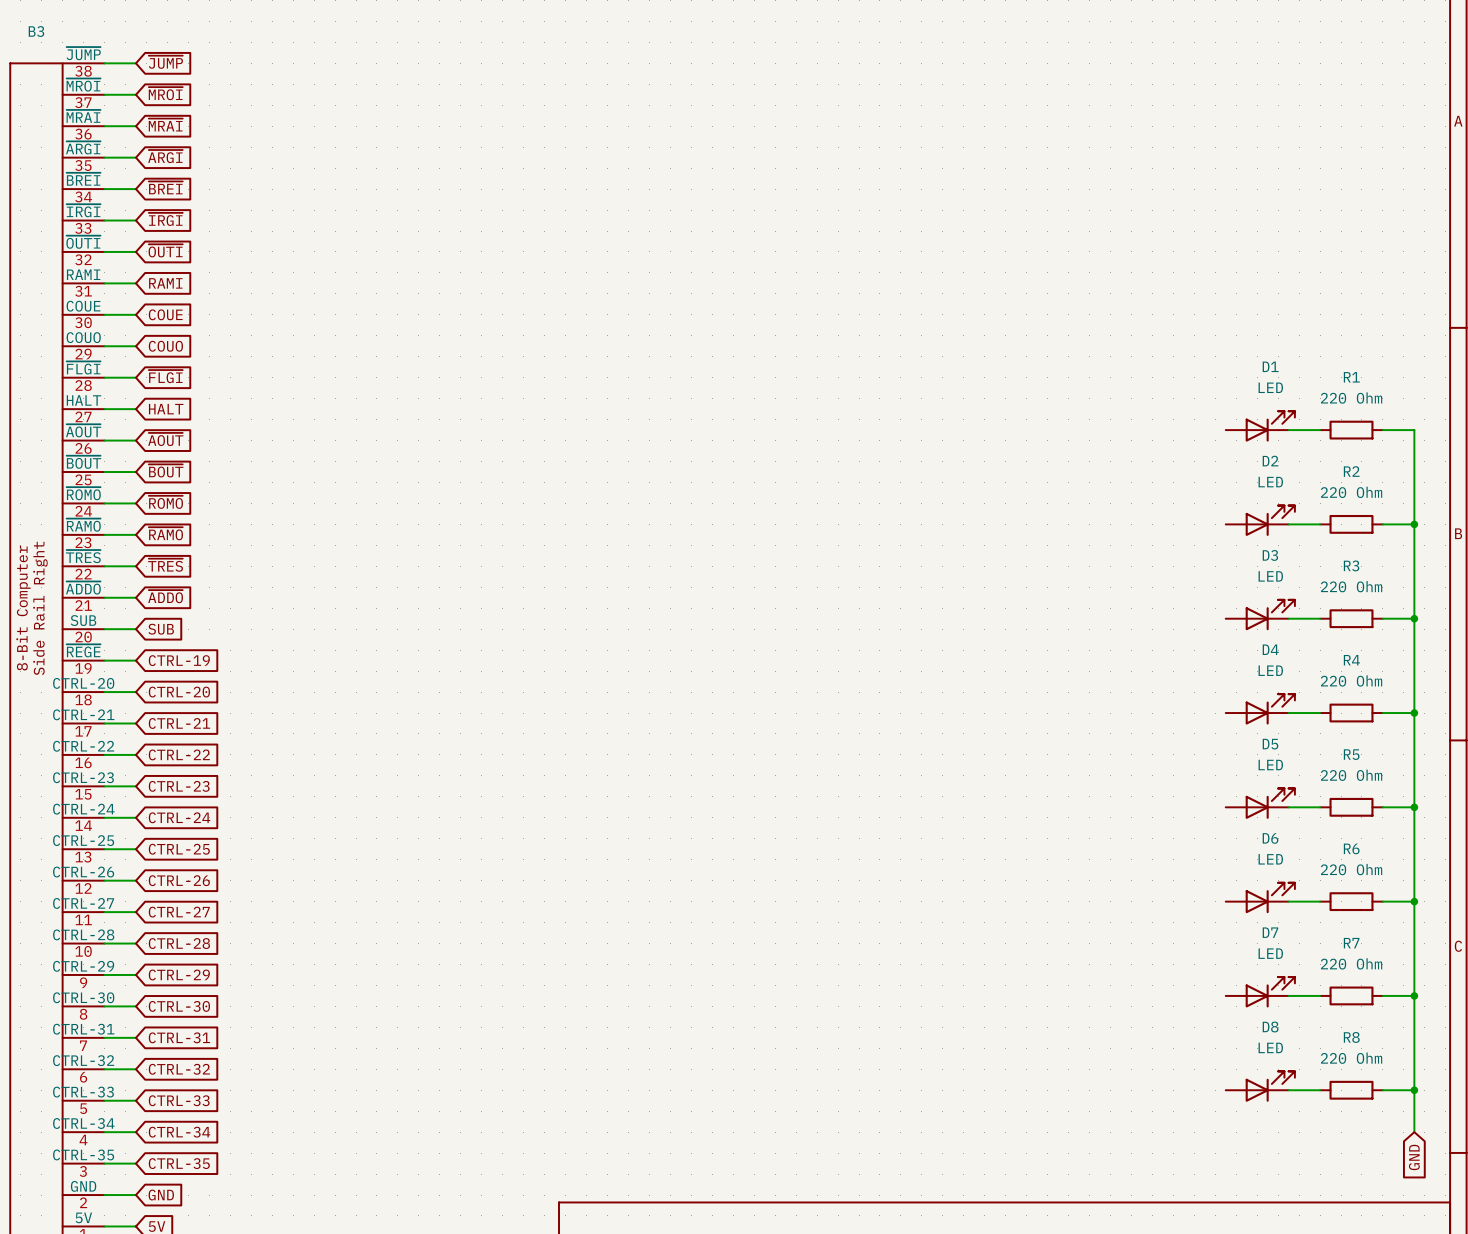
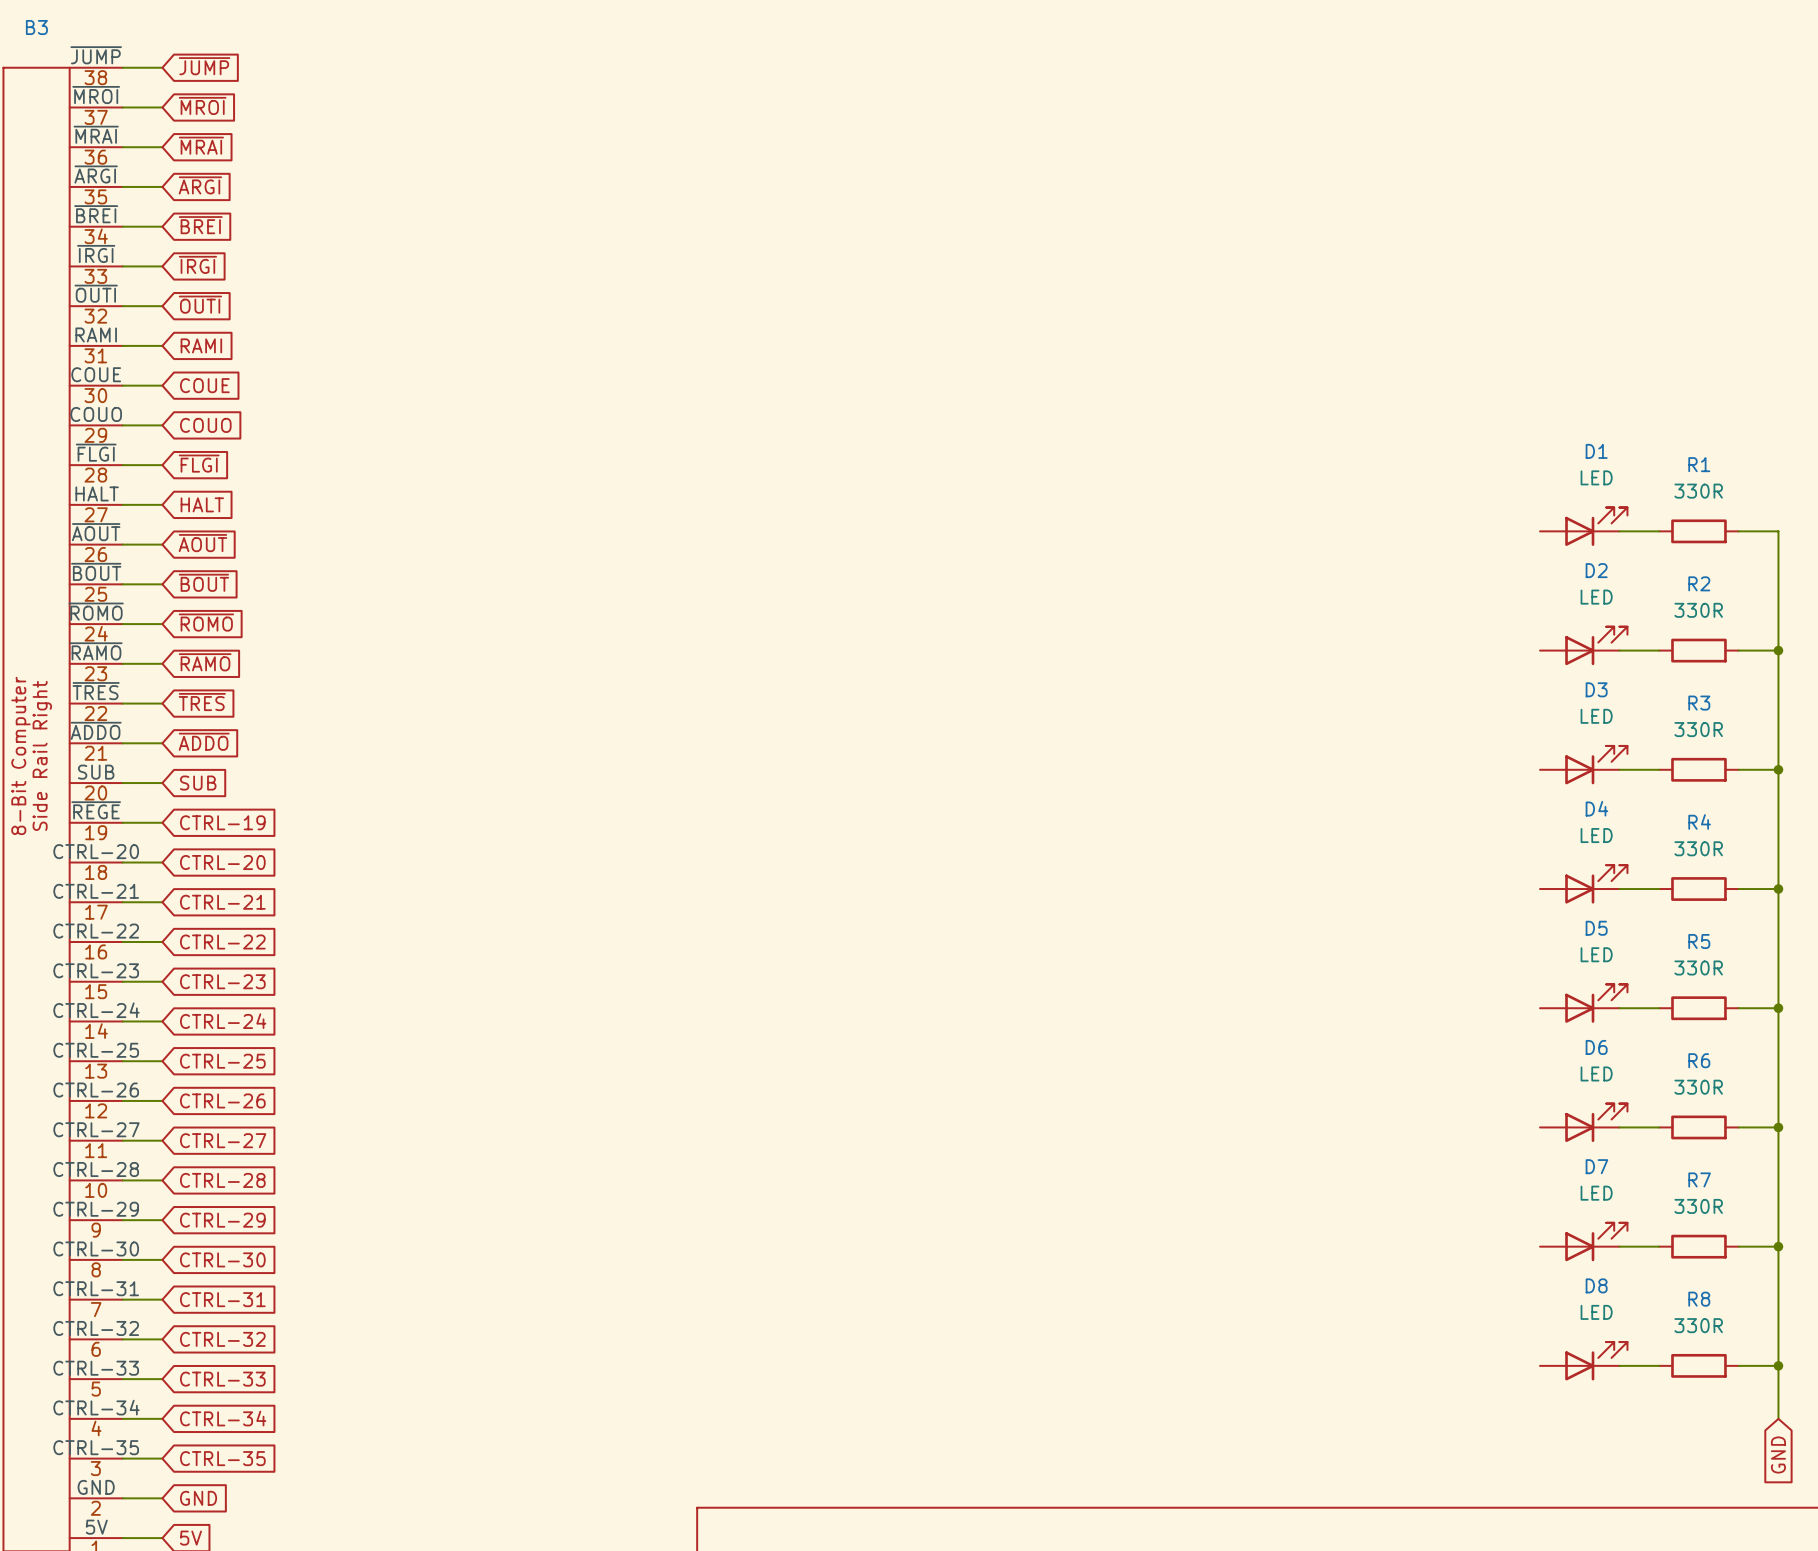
R1 value: 220 Ohm (1351, 398) -> 330R (1698, 491)
R2 value: 220 Ohm (1351, 492) -> 330R (1698, 610)
R3 value: 220 Ohm (1351, 586) -> 330R (1698, 729)
R4 value: 220 Ohm (1351, 680) -> 330R (1698, 848)
R5 value: 220 Ohm (1351, 775) -> 330R (1698, 967)
R6 value: 220 Ohm (1351, 869) -> 330R (1698, 1087)
R7 value: 220 Ohm (1351, 963) -> 330R (1698, 1206)
R8 value: 220 Ohm (1351, 1058) -> 330R (1698, 1325)

